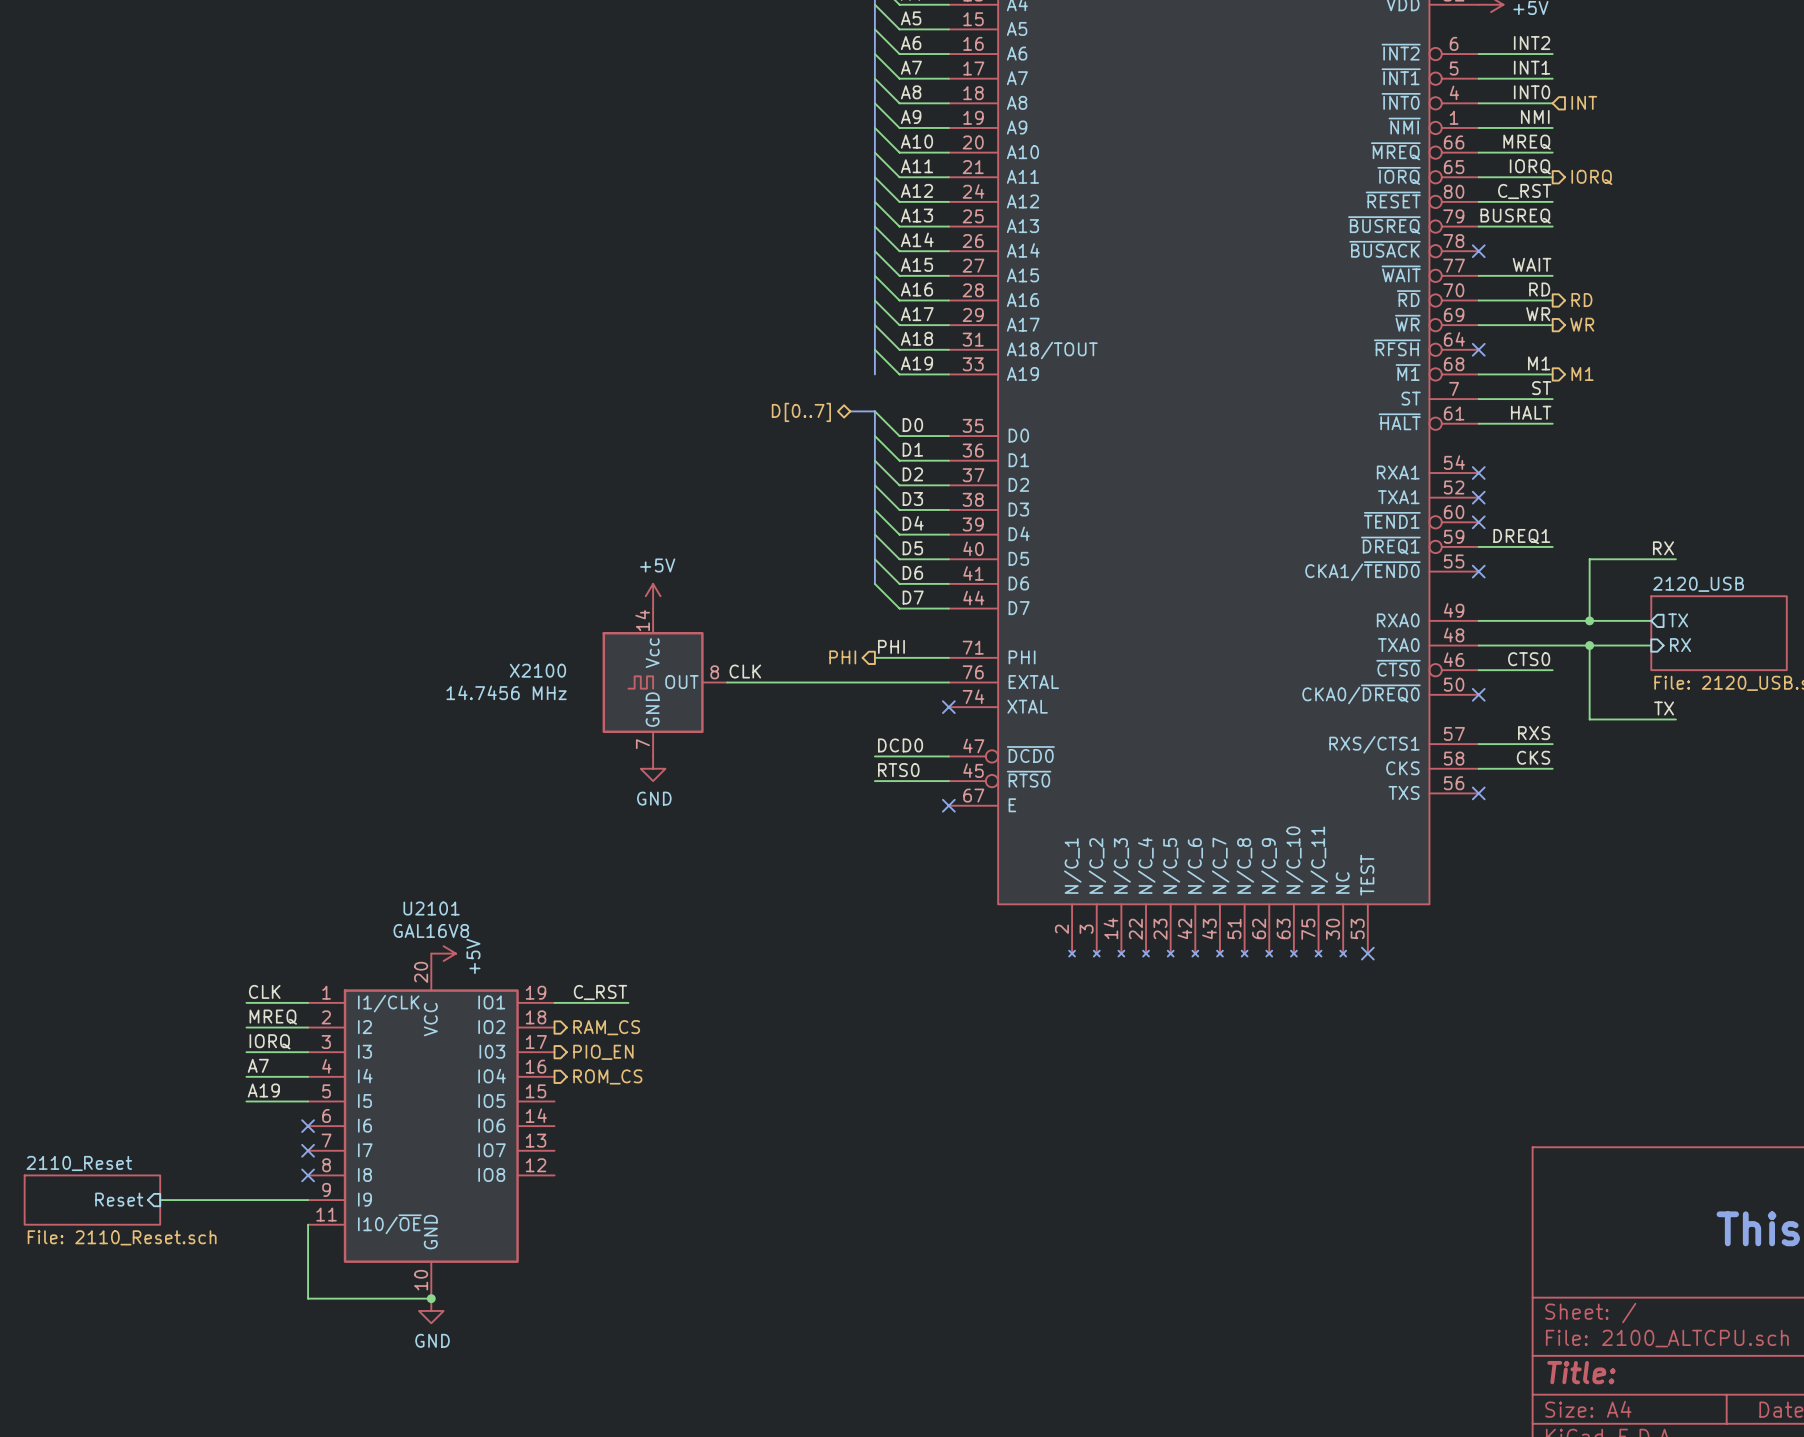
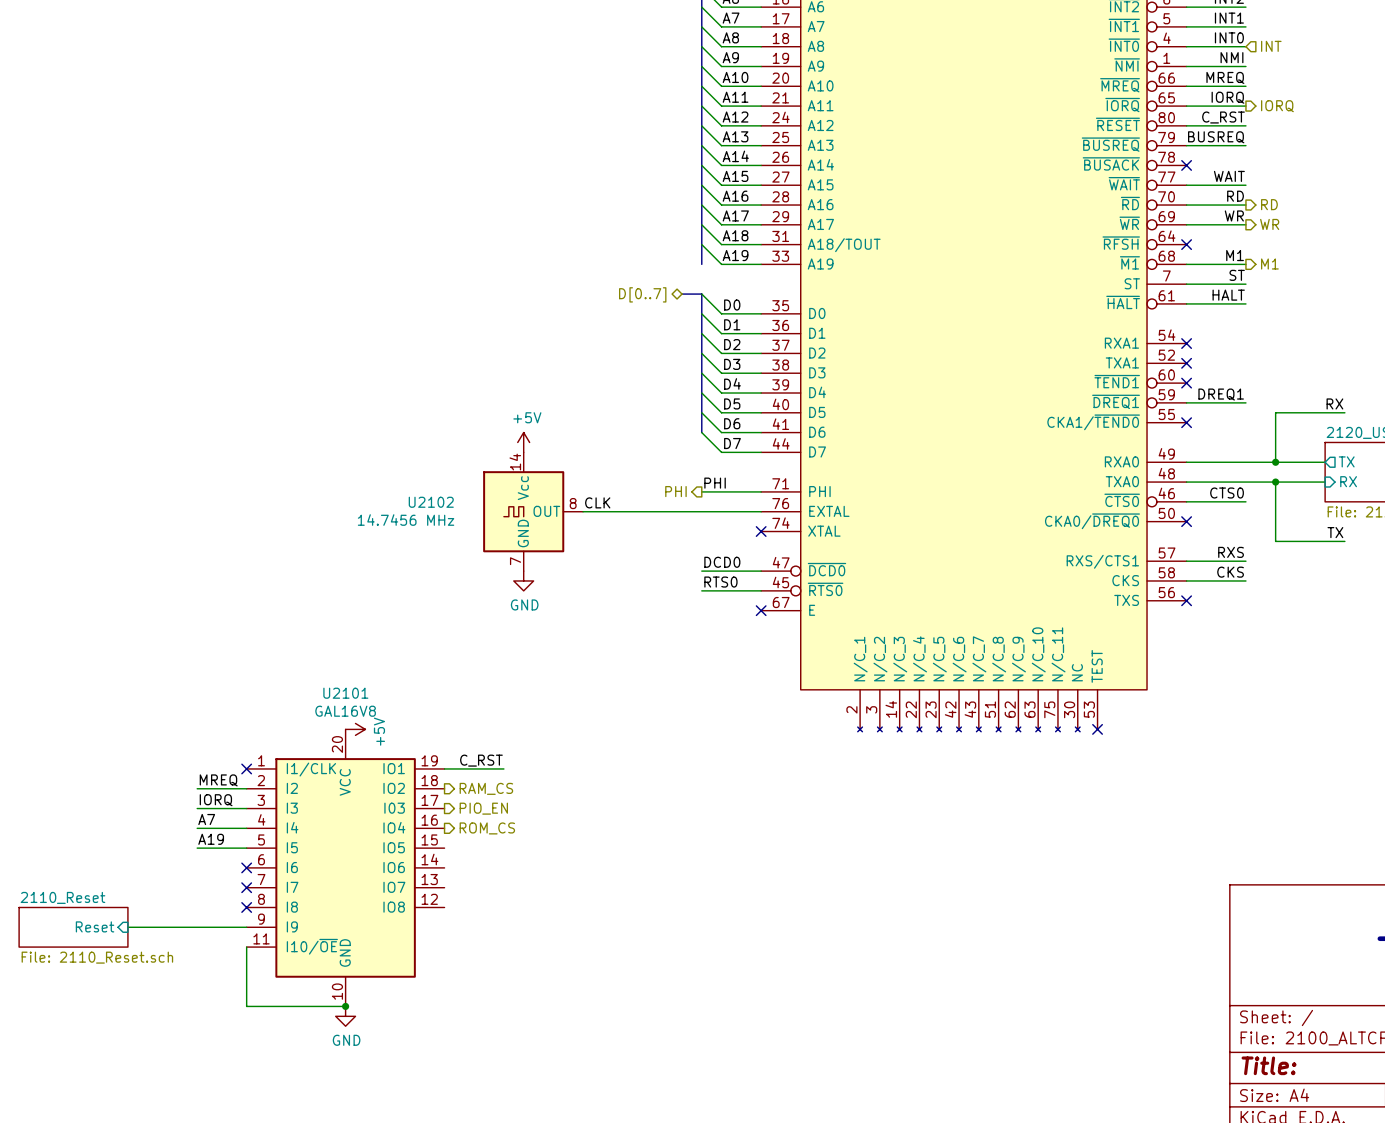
X2100 name: X2100 (537, 670) -> U2102 (431, 502)
label: CLK (264, 991) -> none
wire: (246, 1002) (308, 1002) -> none
no-connect mark: none -> (246, 768)

